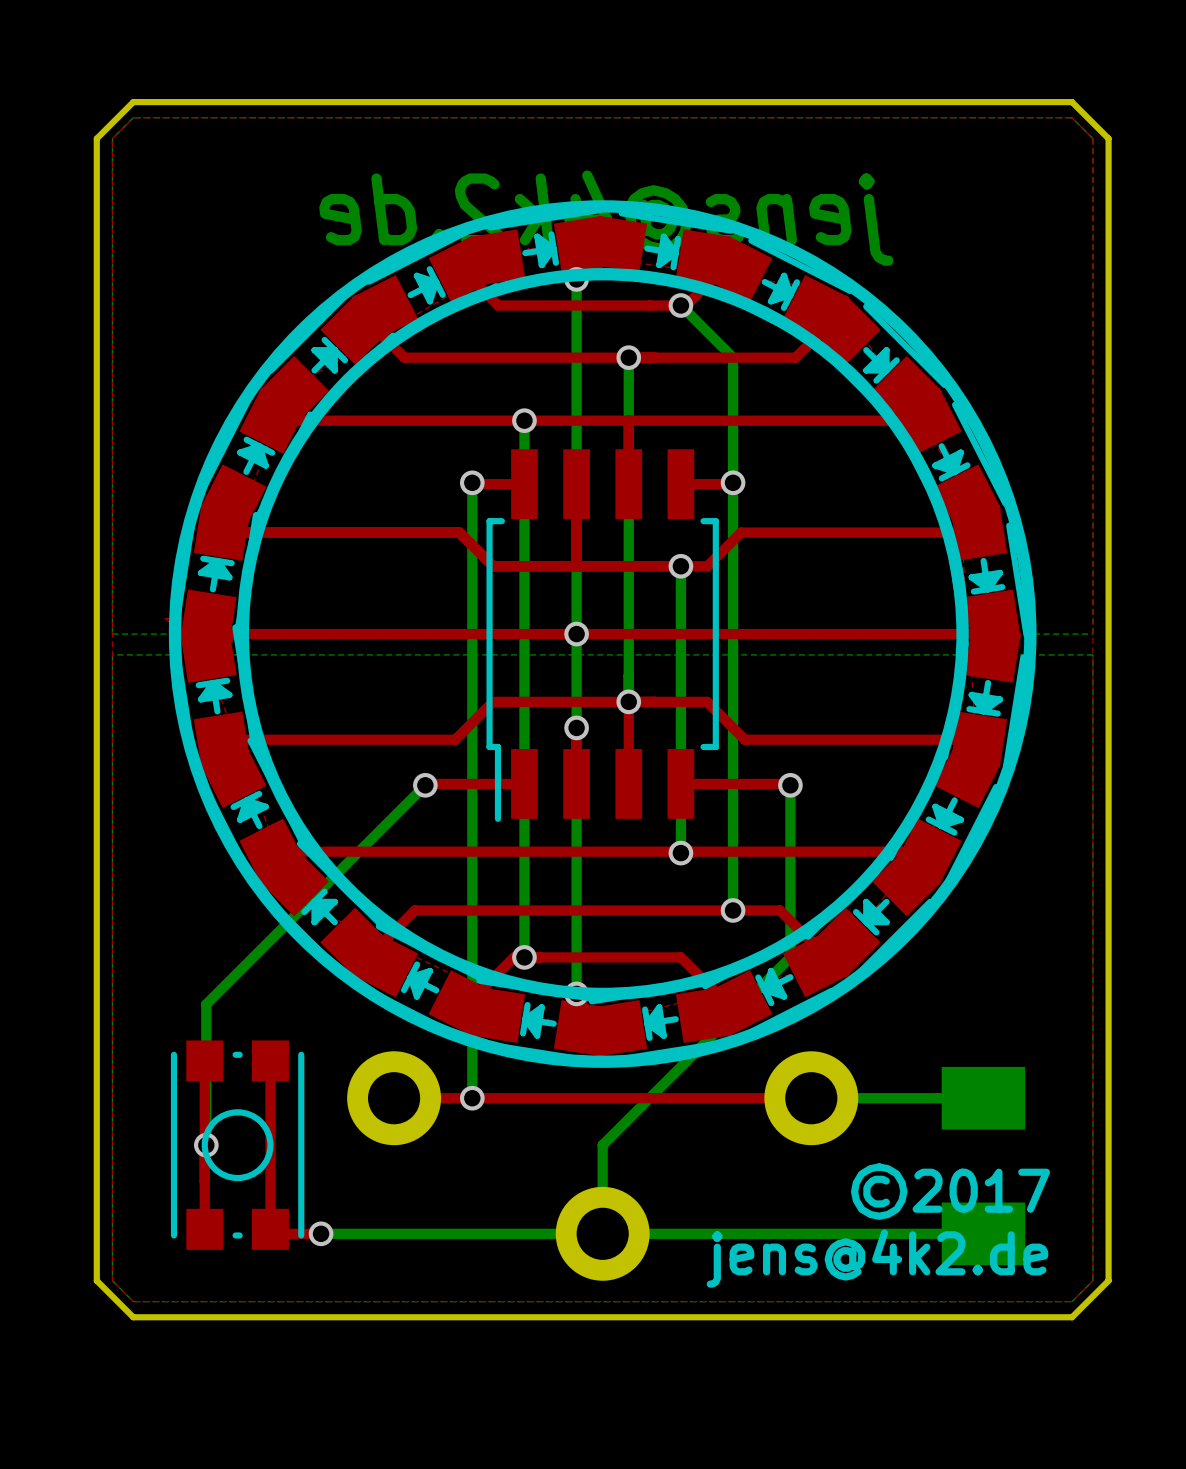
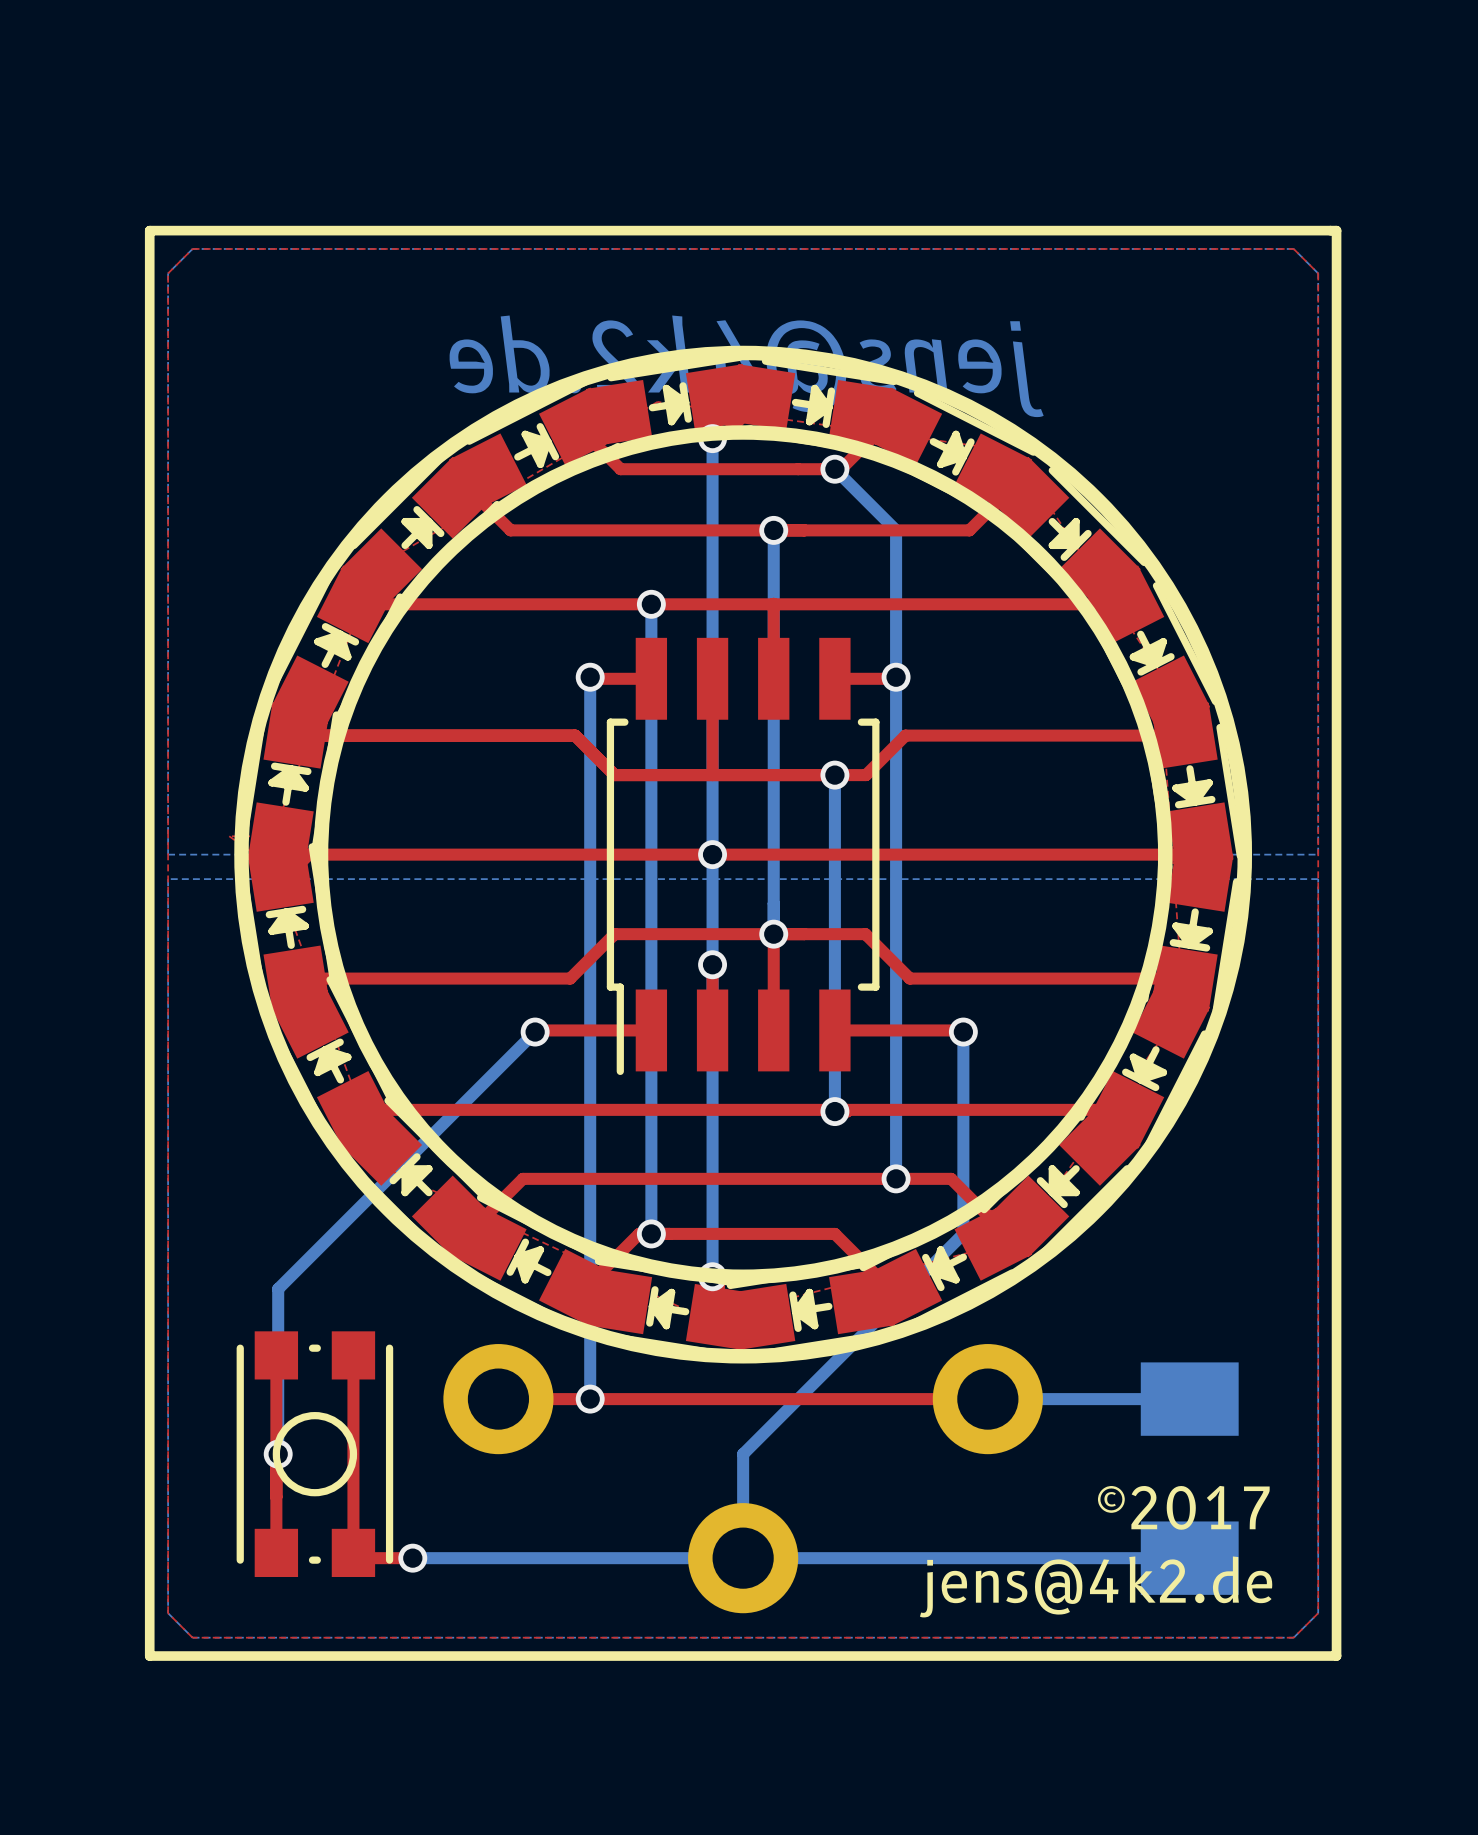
line: none -> (149, 230) (1336, 230) (1336, 1656) (149, 1656) (149, 230)
board edge: (133, 102) (1072, 102) (1108, 138) (1108, 1280) (1072, 1317) (133, 1317) (96, 1280) (96, 138) (133, 102) -> none

